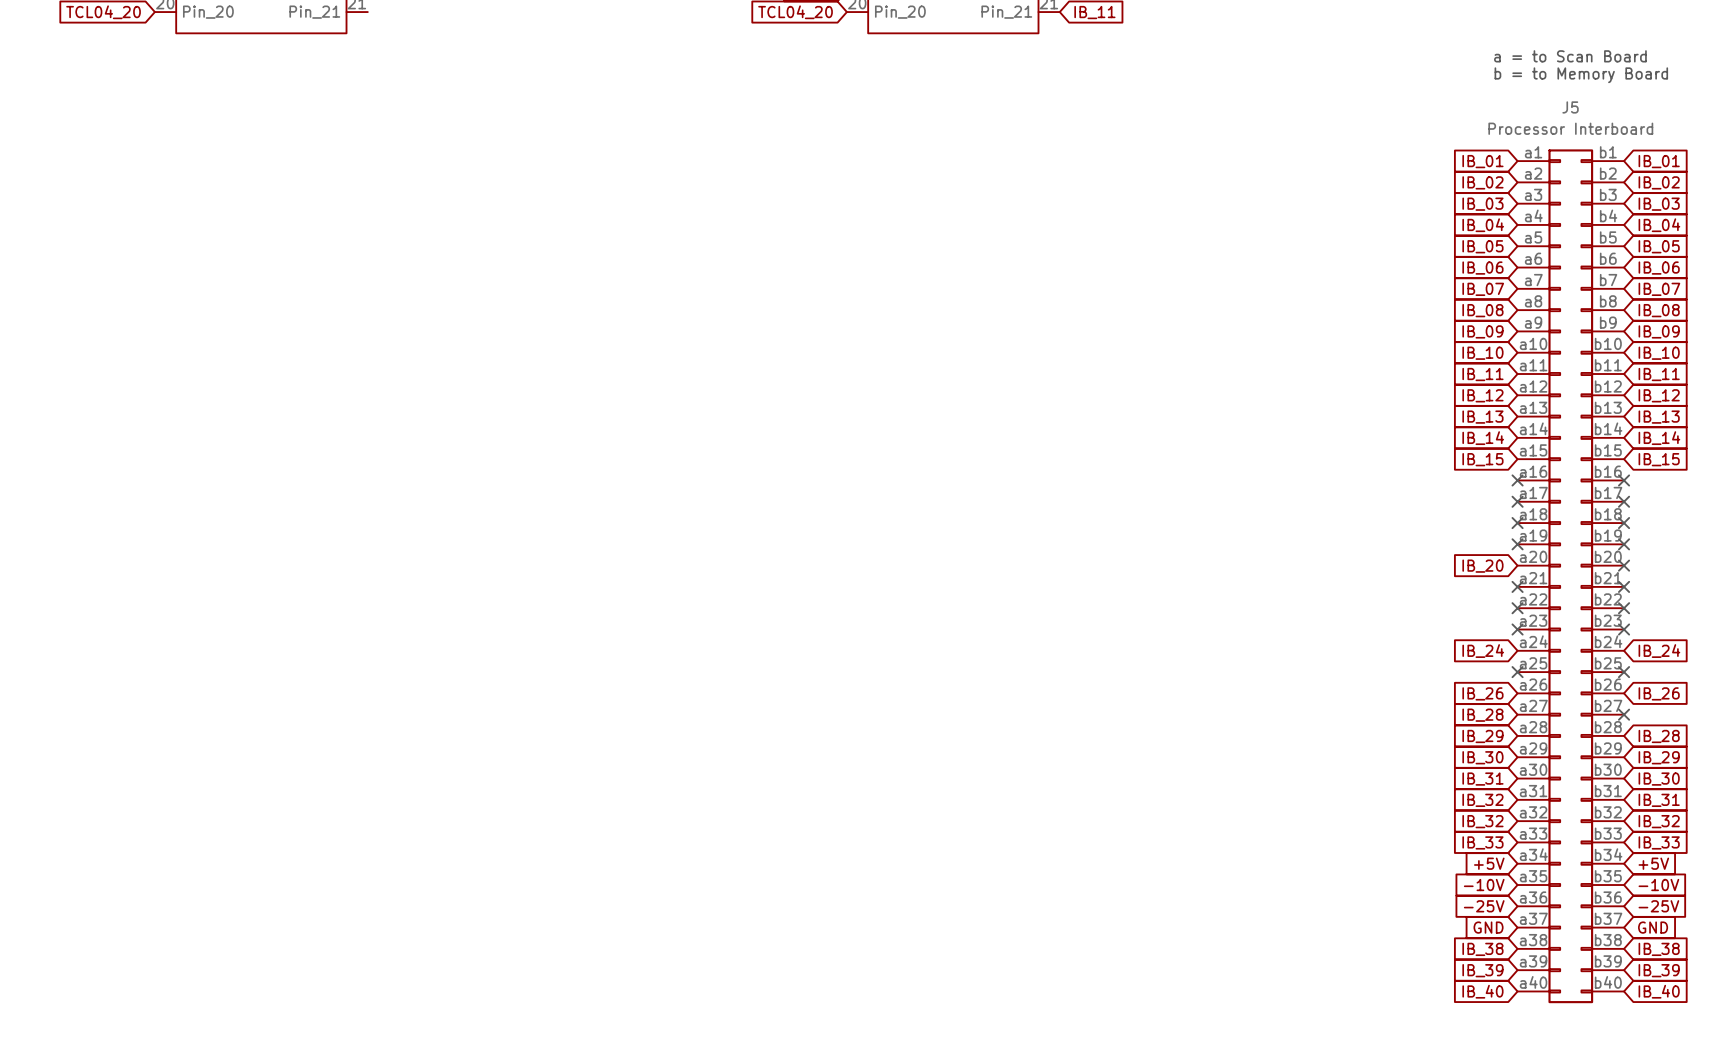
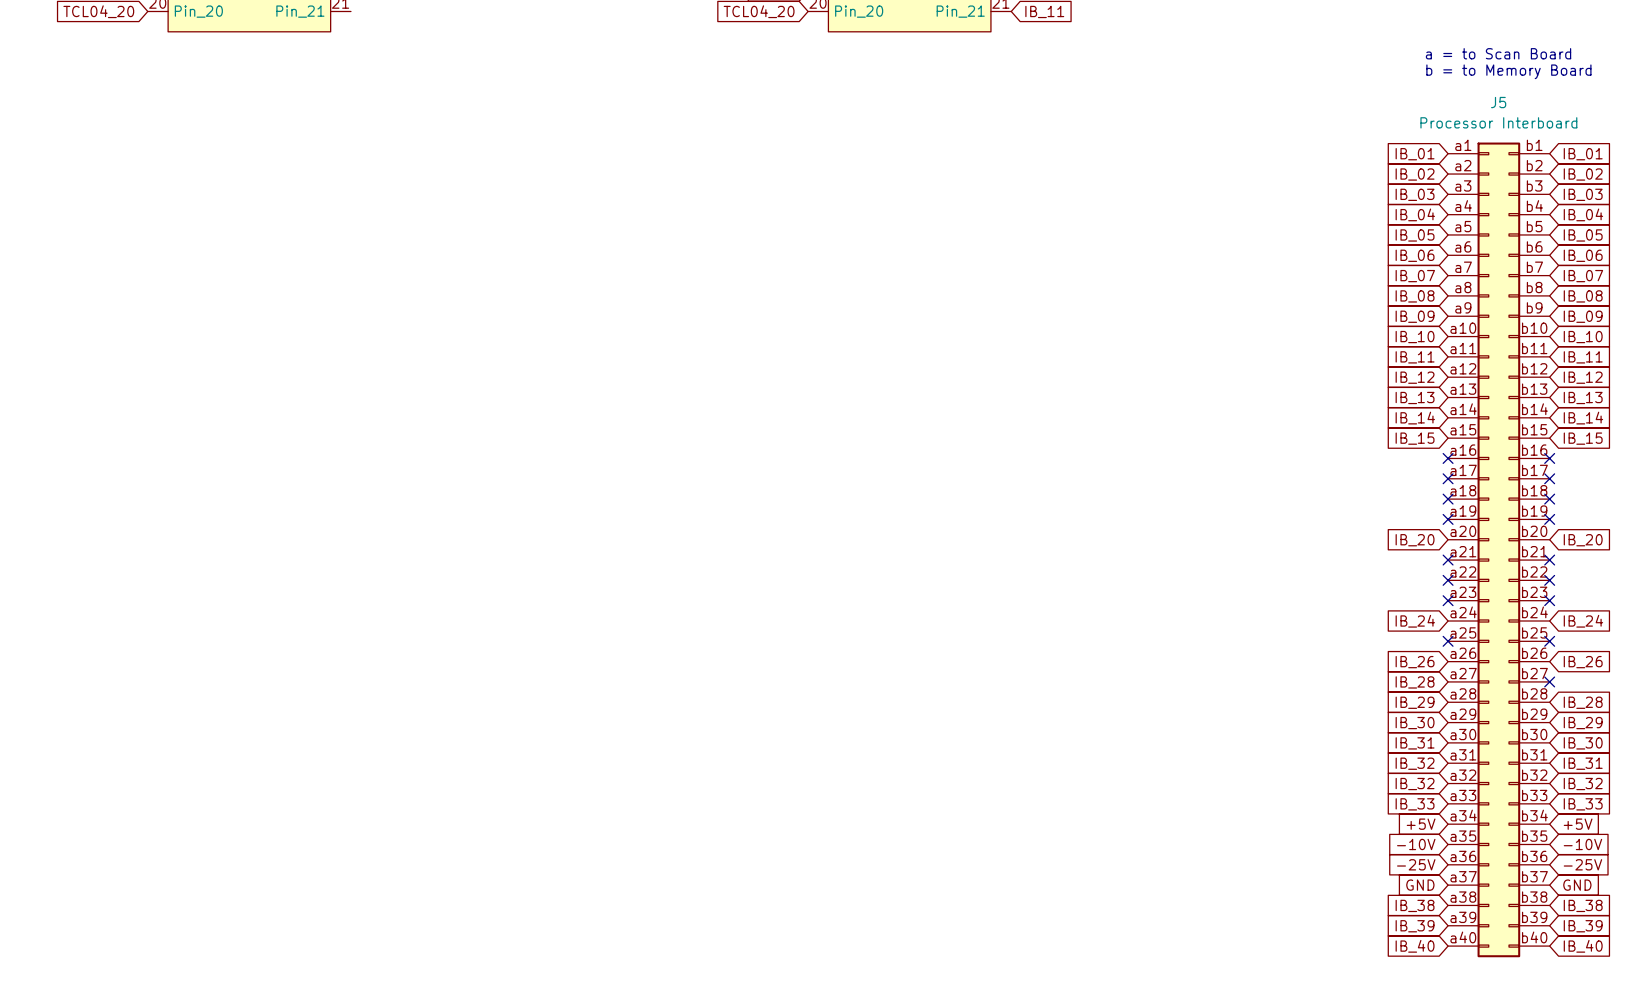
no-connect mark: (1624, 565) -> none
global label: none -> IB_20 (1583, 540)

